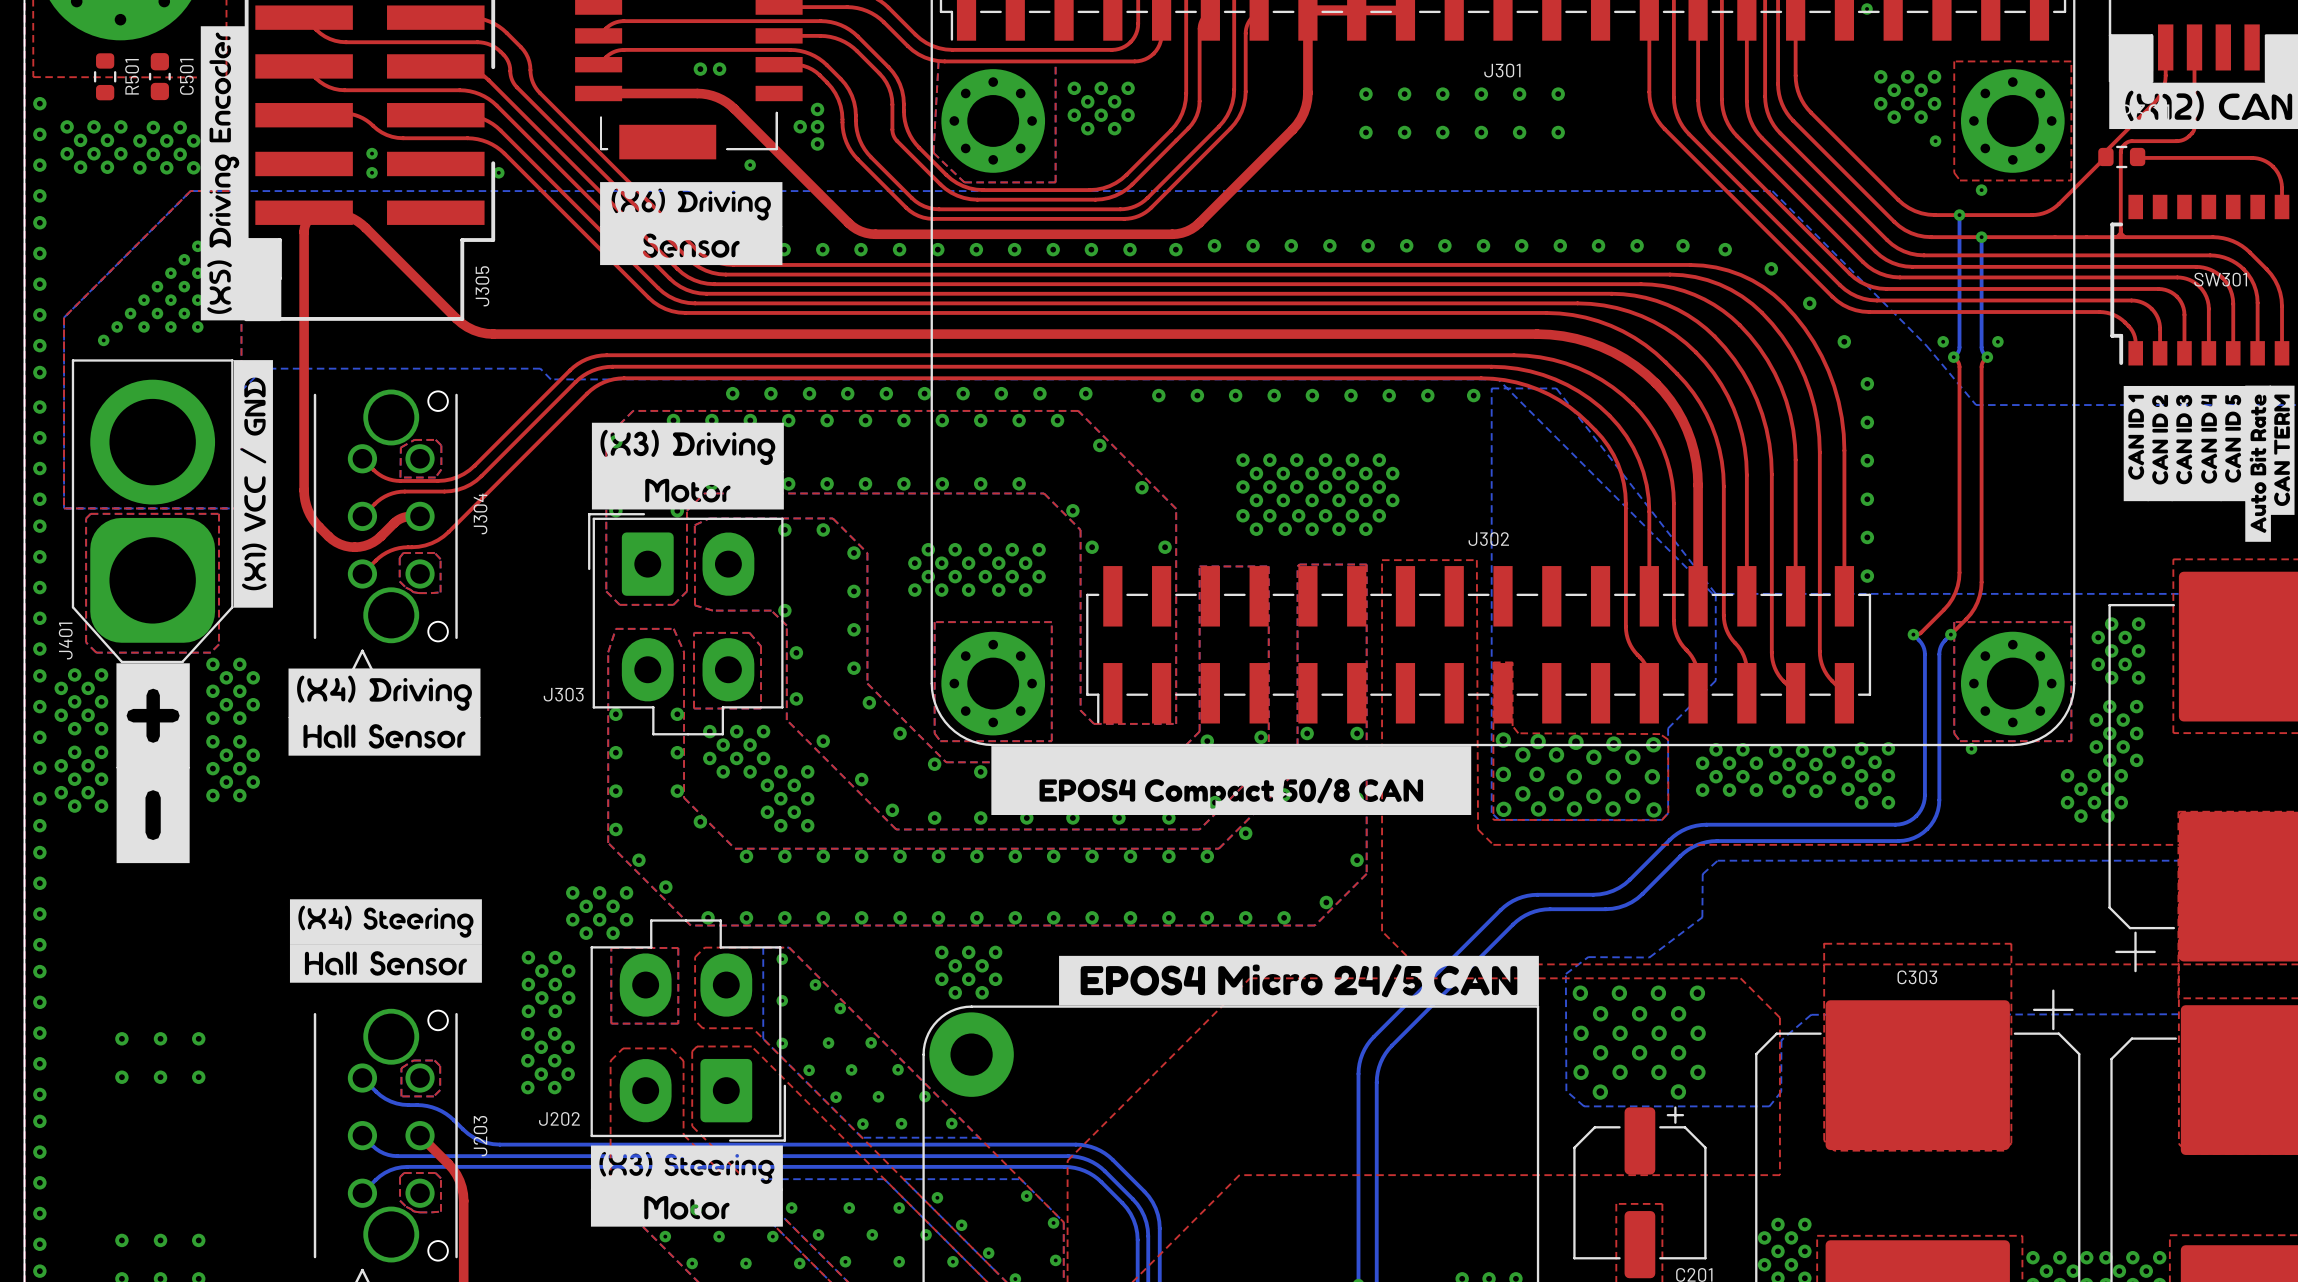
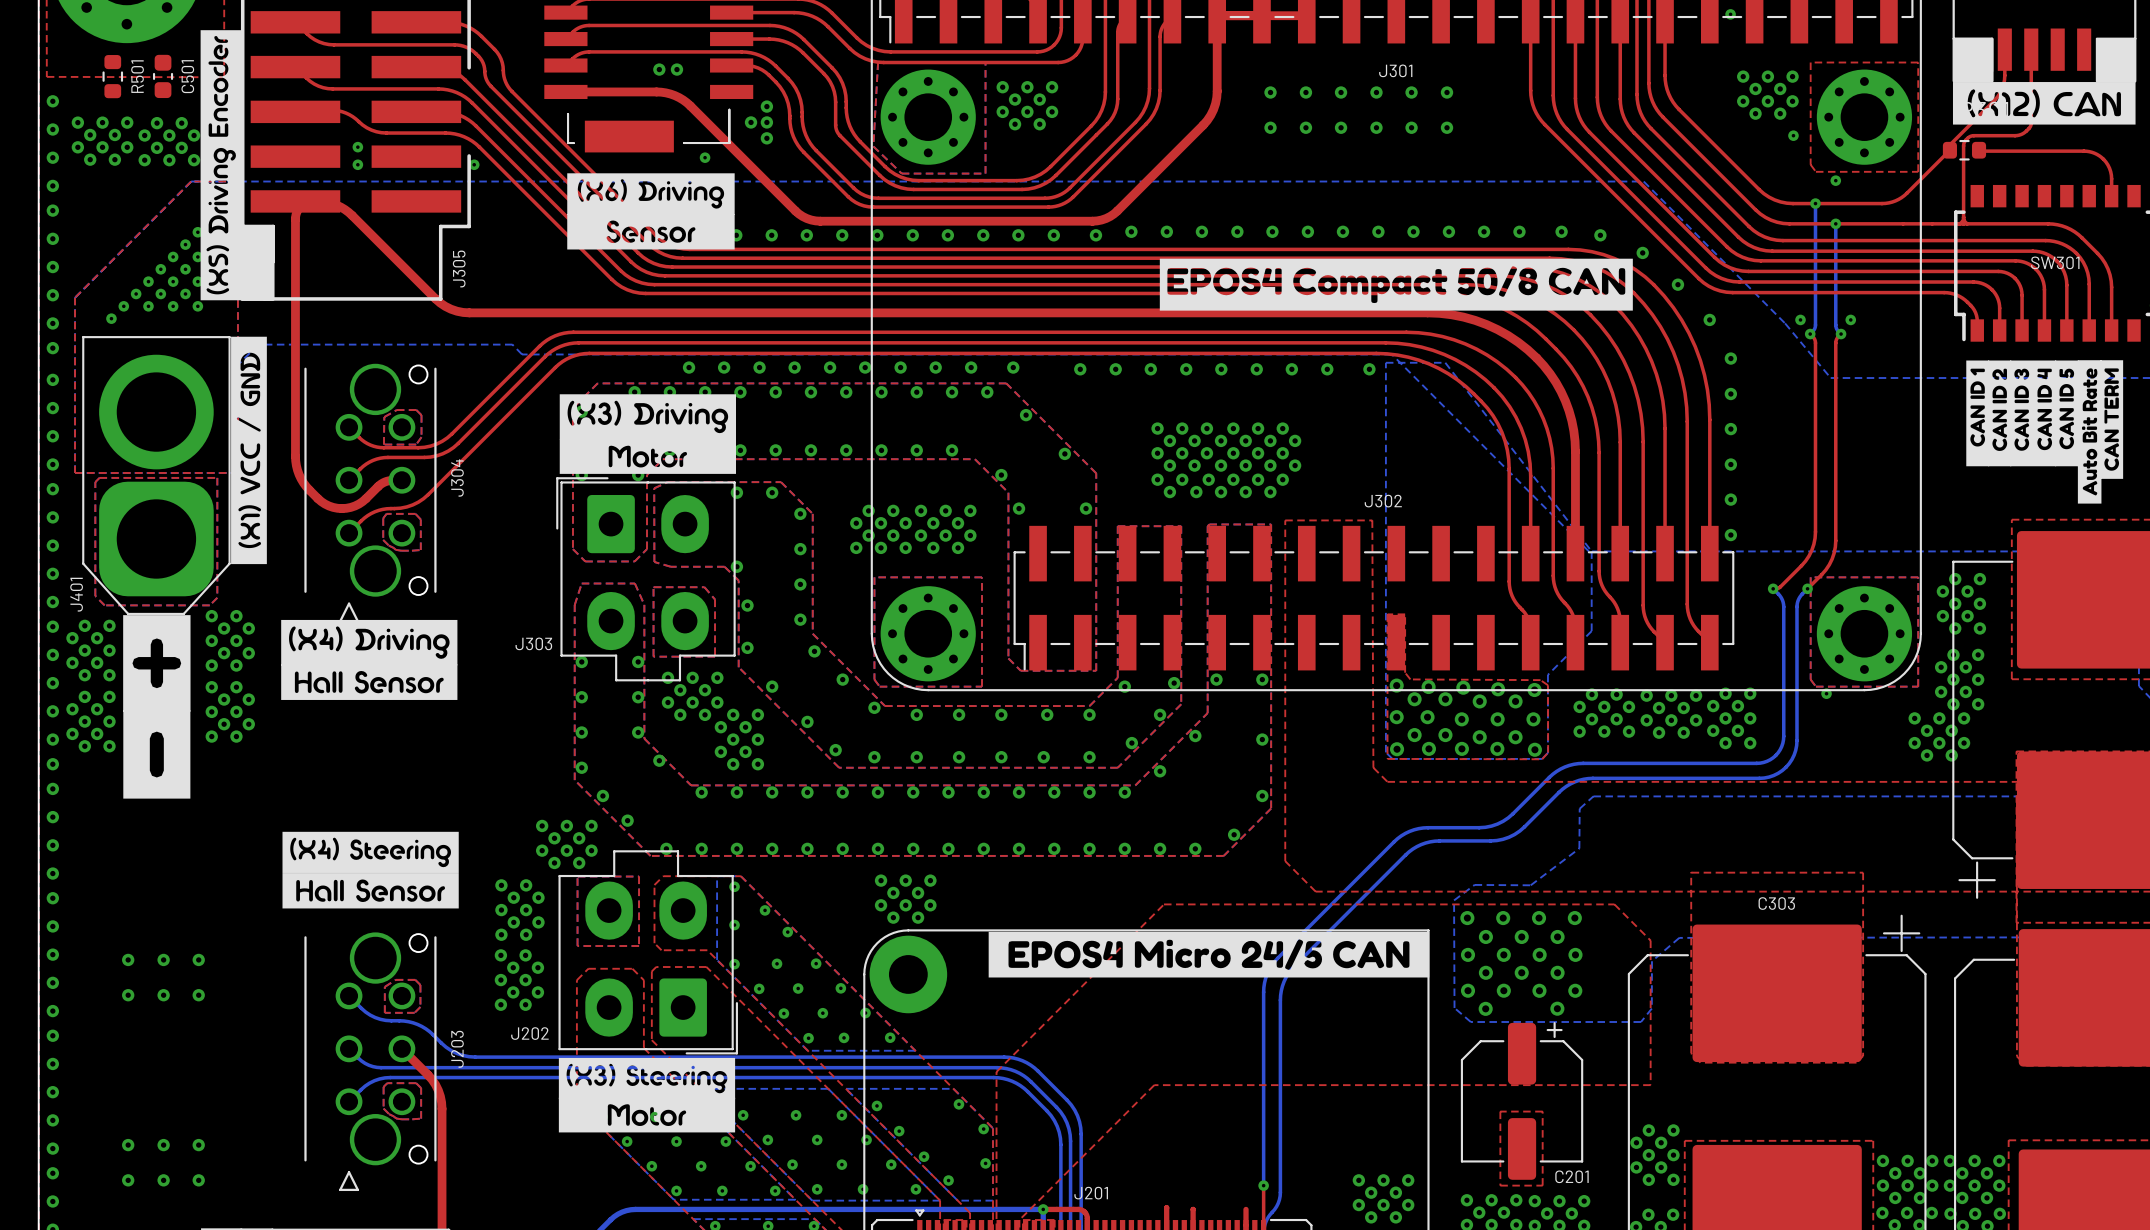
drawing: none -> [1159, 258, 1633, 311]
drawing: [991, 746, 1472, 816] -> none
drawing position: (1298, 980) -> (1208, 954)

